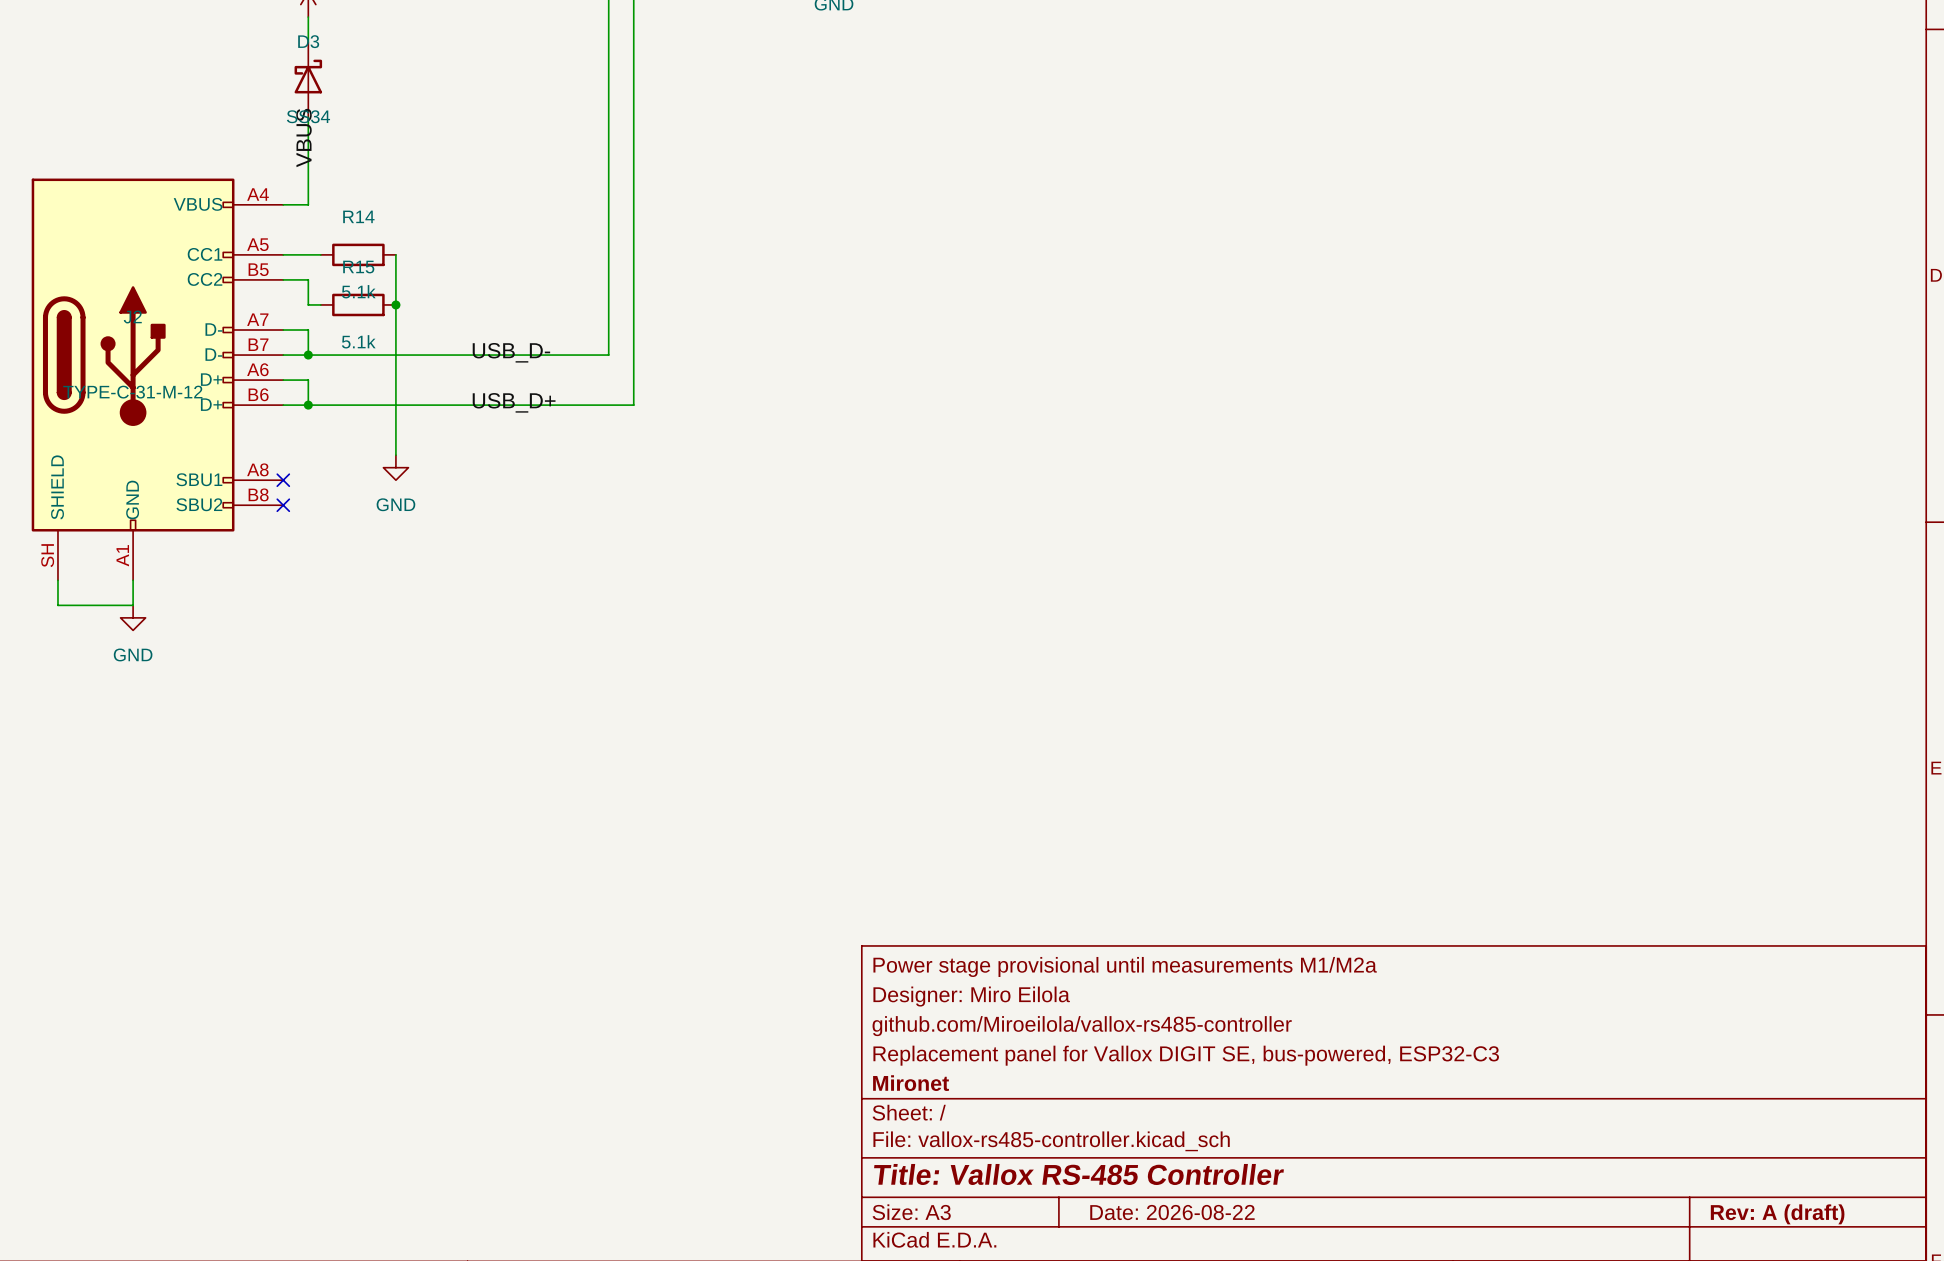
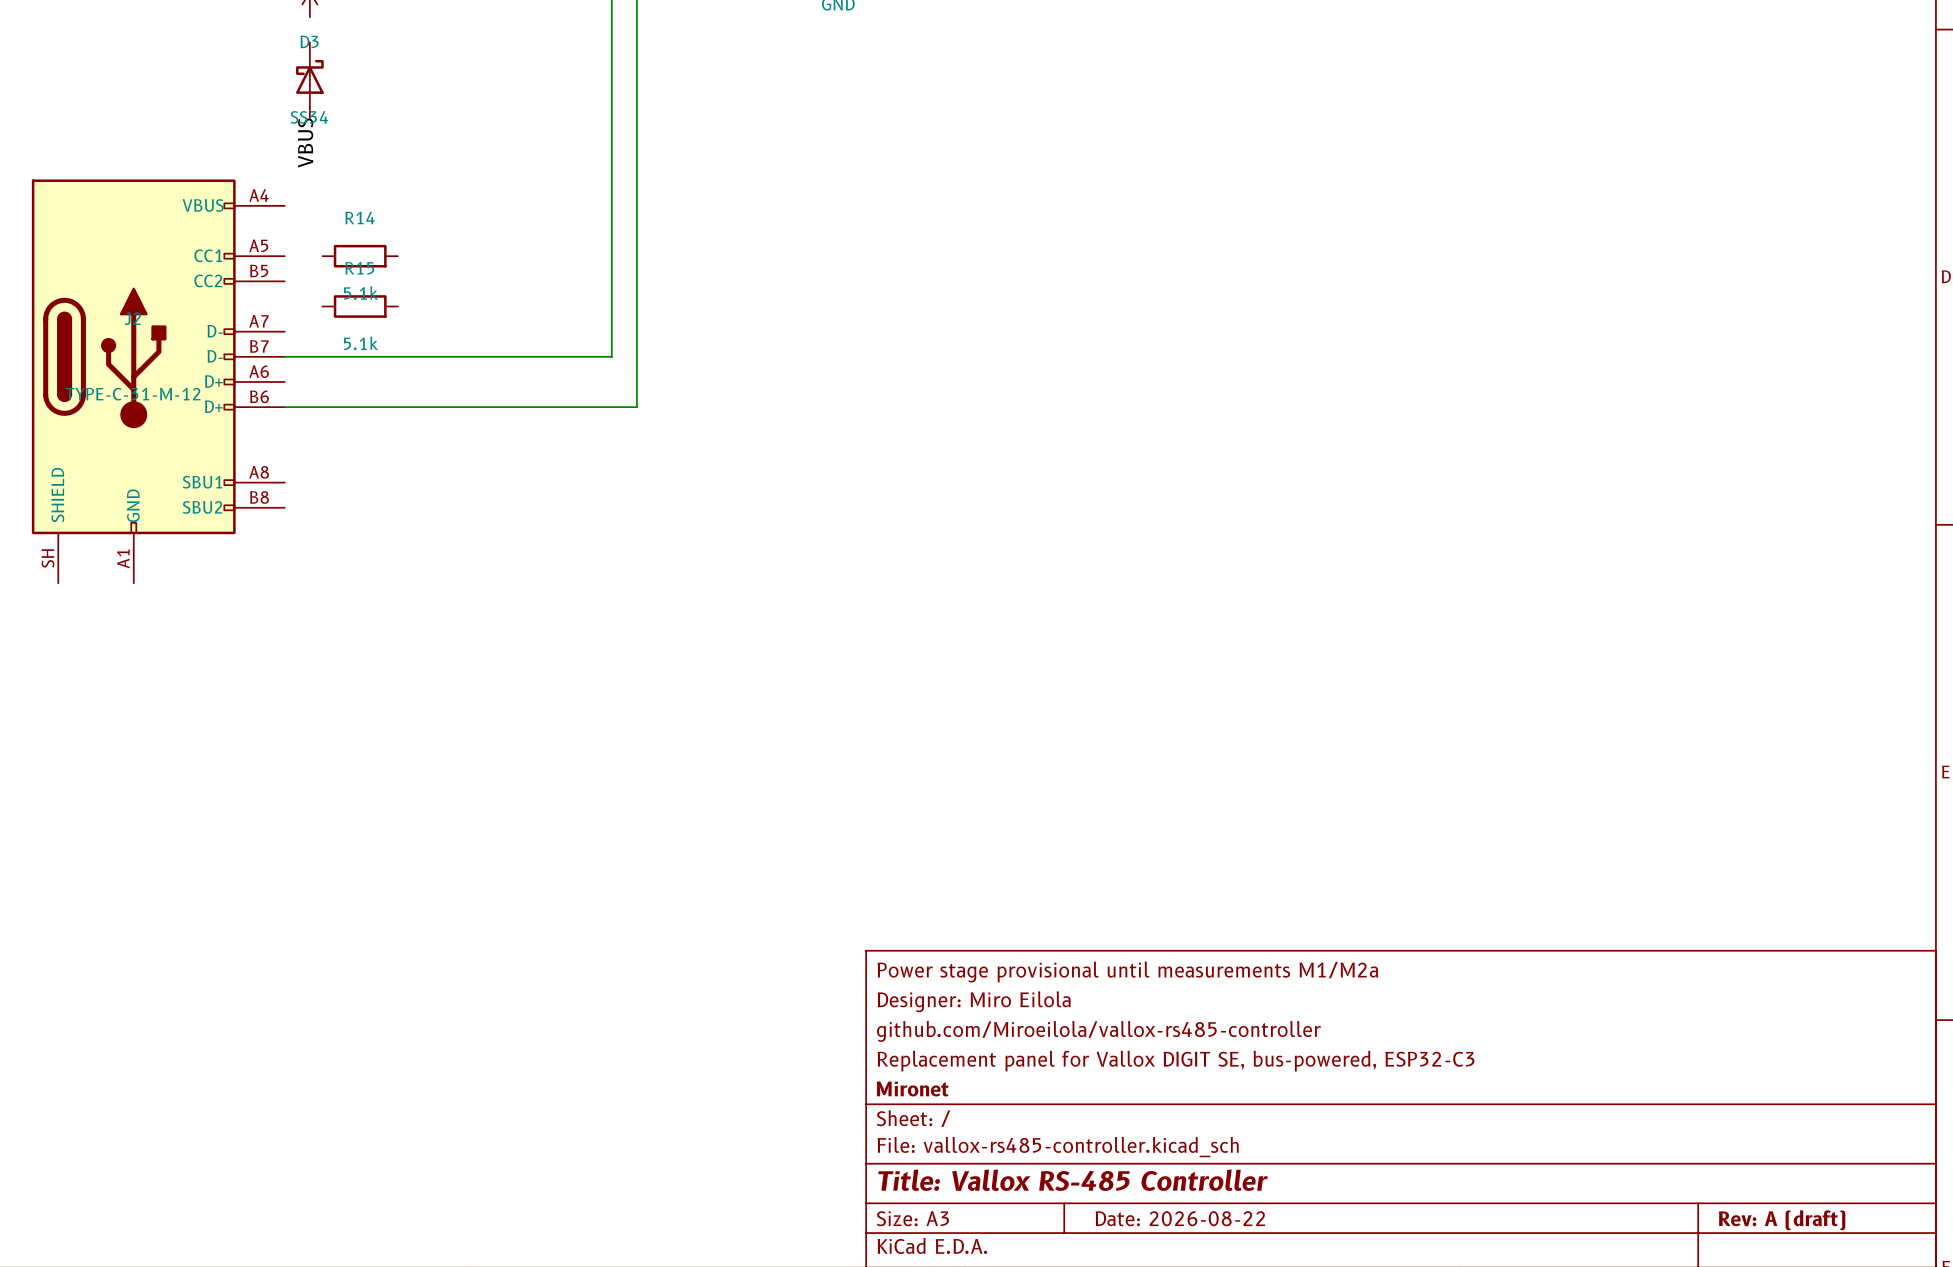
wire: (308, 17) (308, 42) -> none
wire: (308, 117) (308, 204) (283, 204) -> none
wire: (283, 254) (320, 254) -> none
wire: (395, 254) (395, 455) -> none
wire: (283, 279) (308, 279) (308, 304) (320, 304) -> none
junction: (395, 304) -> none
wire: (283, 330) (308, 330) (308, 355) -> none
label: USB_D- (511, 352) -> none
junction: (308, 355) -> none
wire: (283, 380) (308, 380) (308, 405) -> none
label: USB_D+ (514, 402) -> none
junction: (308, 405) -> none
power symbol: GND (395, 467) -> none
no-connect mark: (283, 480) -> none
no-connect mark: (283, 505) -> none
wire: (57, 580) (57, 605) (133, 605) (133, 580) -> none
power symbol: GND (133, 617) -> none

